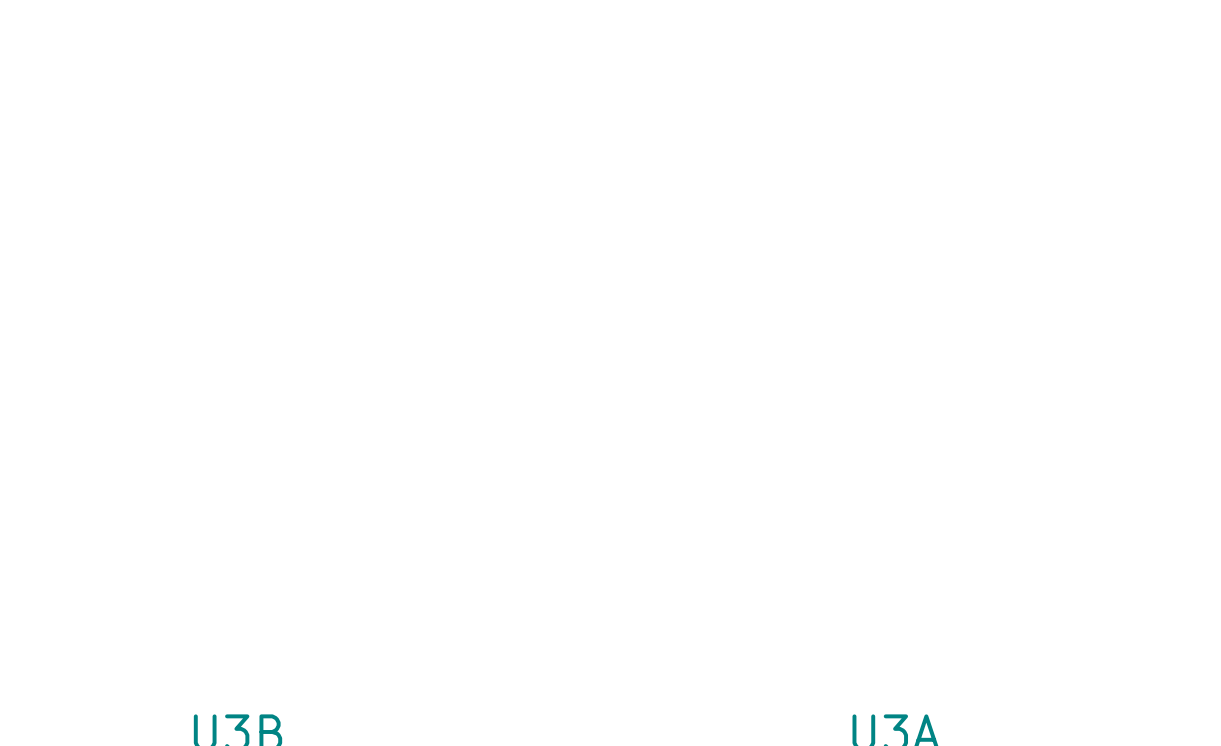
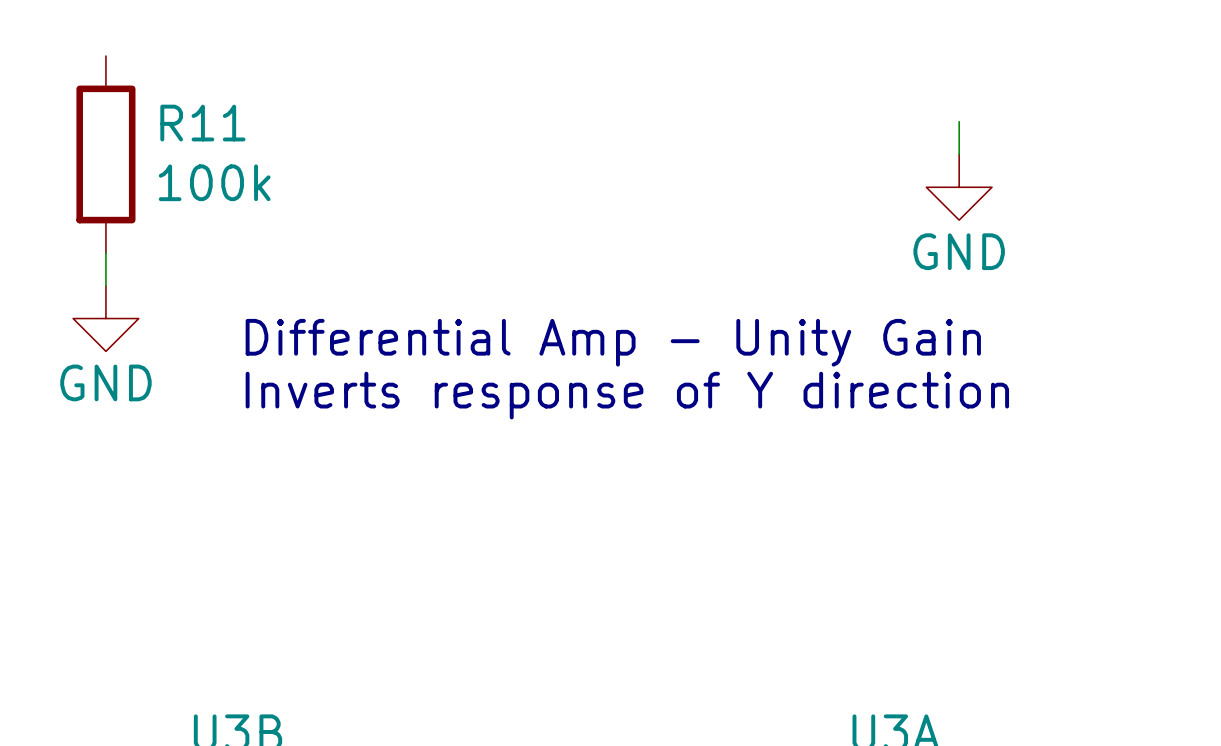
wire: none -> (959, 121) (959, 154)
R11: none -> 100k (105, 154)
power symbol: none -> GND (959, 187)
wire: none -> (105, 252) (105, 285)
power symbol: none -> GND (105, 318)
text: none -> Differential Amp - Unity Gain (613, 342)
text: none -> Inverts response of Y direction (627, 395)

